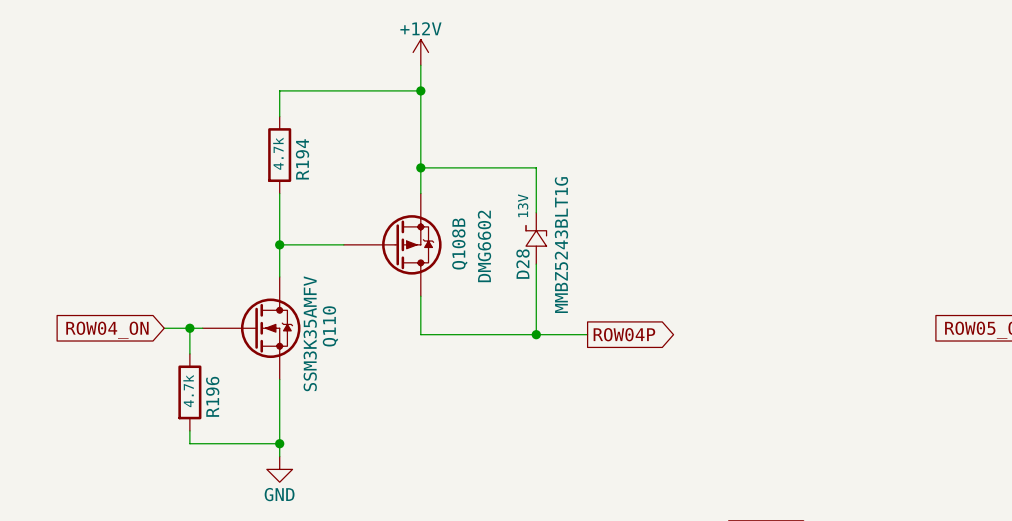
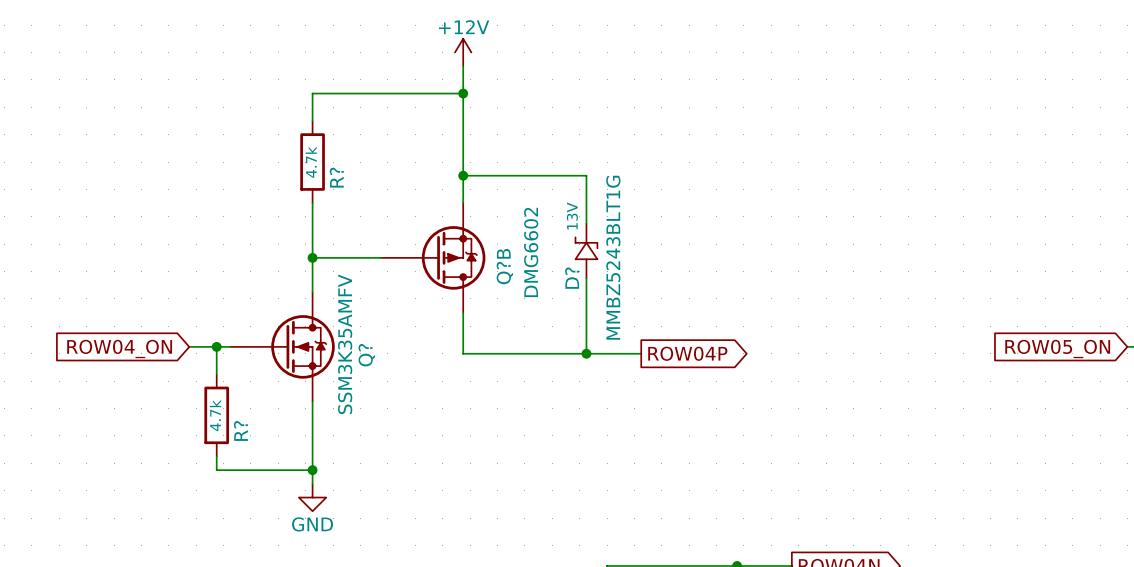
R194 name: R194 (302, 159) -> R? (336, 177)
Q108B name: Q108B (459, 243) -> Q?B (504, 266)
D28 name: D28 (522, 264) -> D? (572, 278)
Q110 name: Q110 (330, 326) -> Q? (366, 355)
R196 name: R196 (212, 396) -> R? (240, 430)

